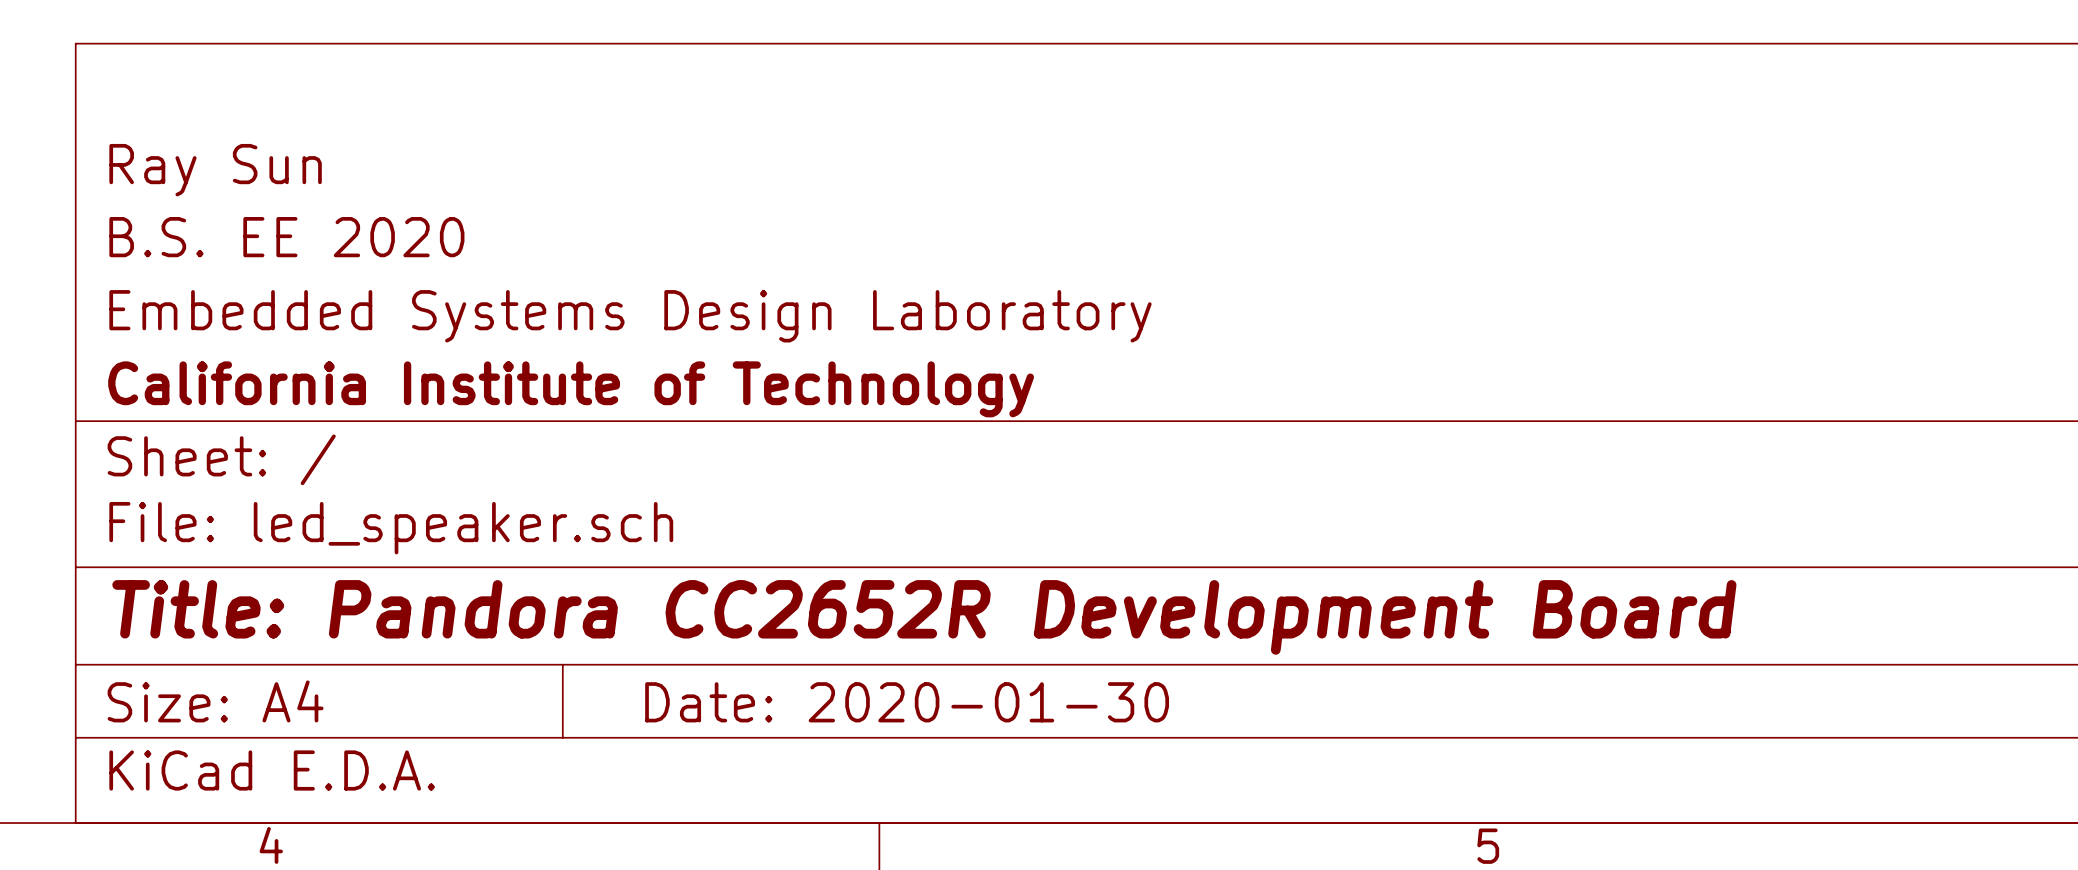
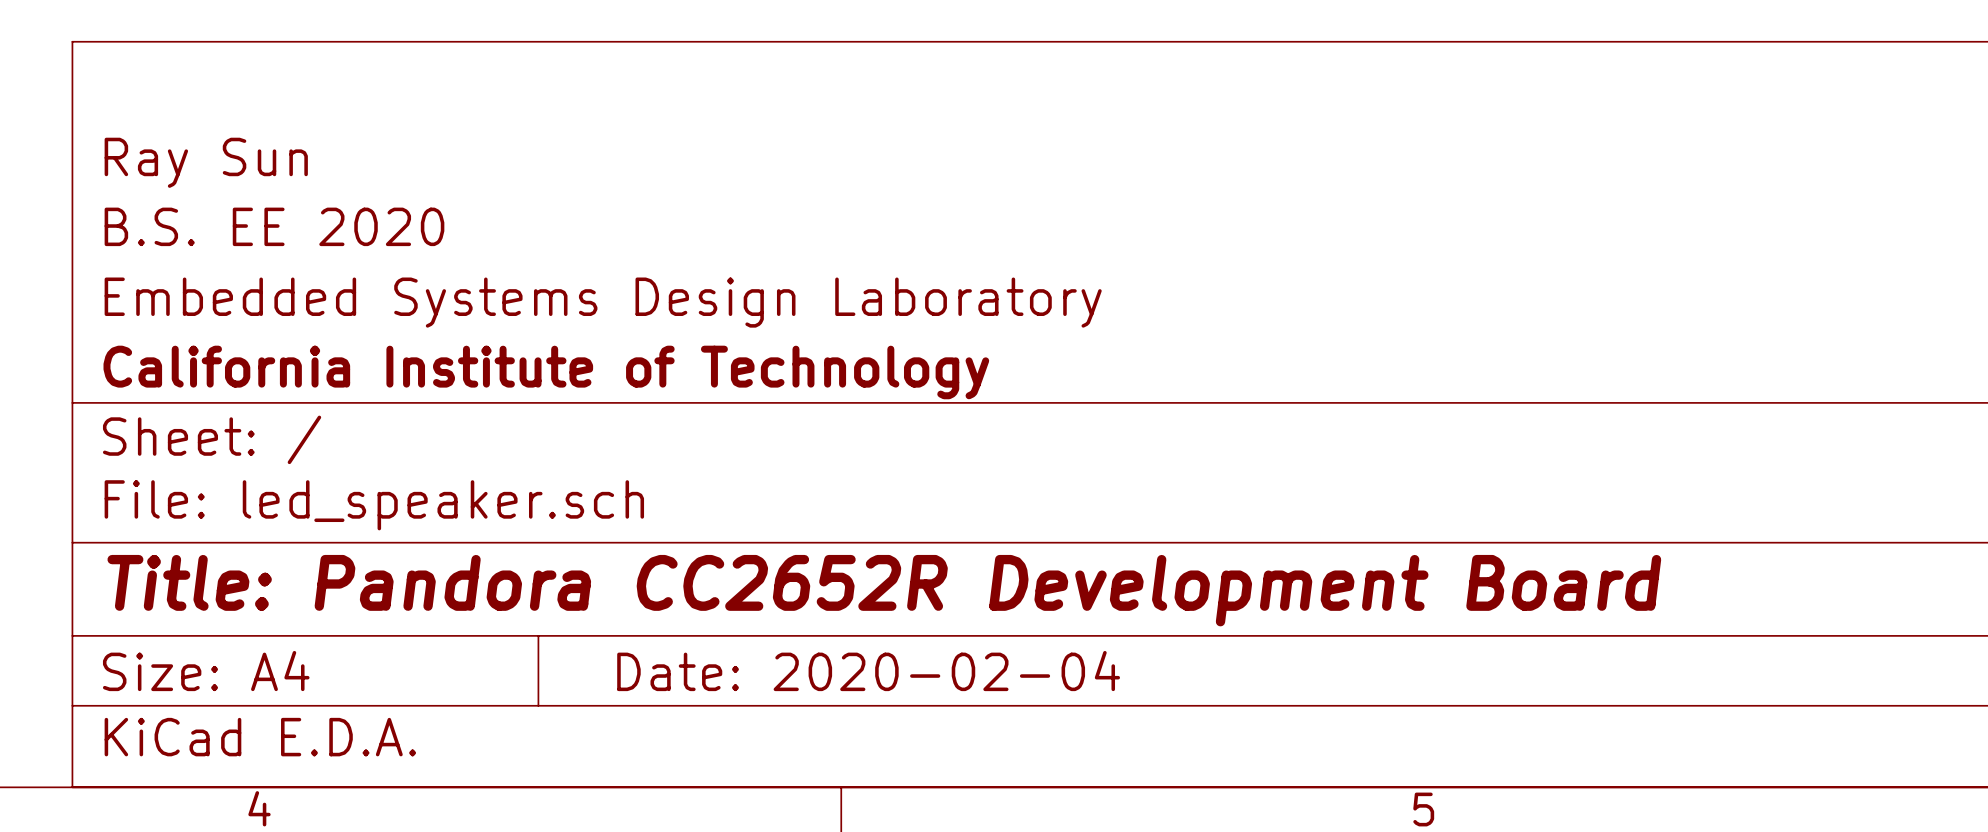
title block: Date: 2020-01-30 (907, 702) -> Date: 2020-02-04 (868, 671)

